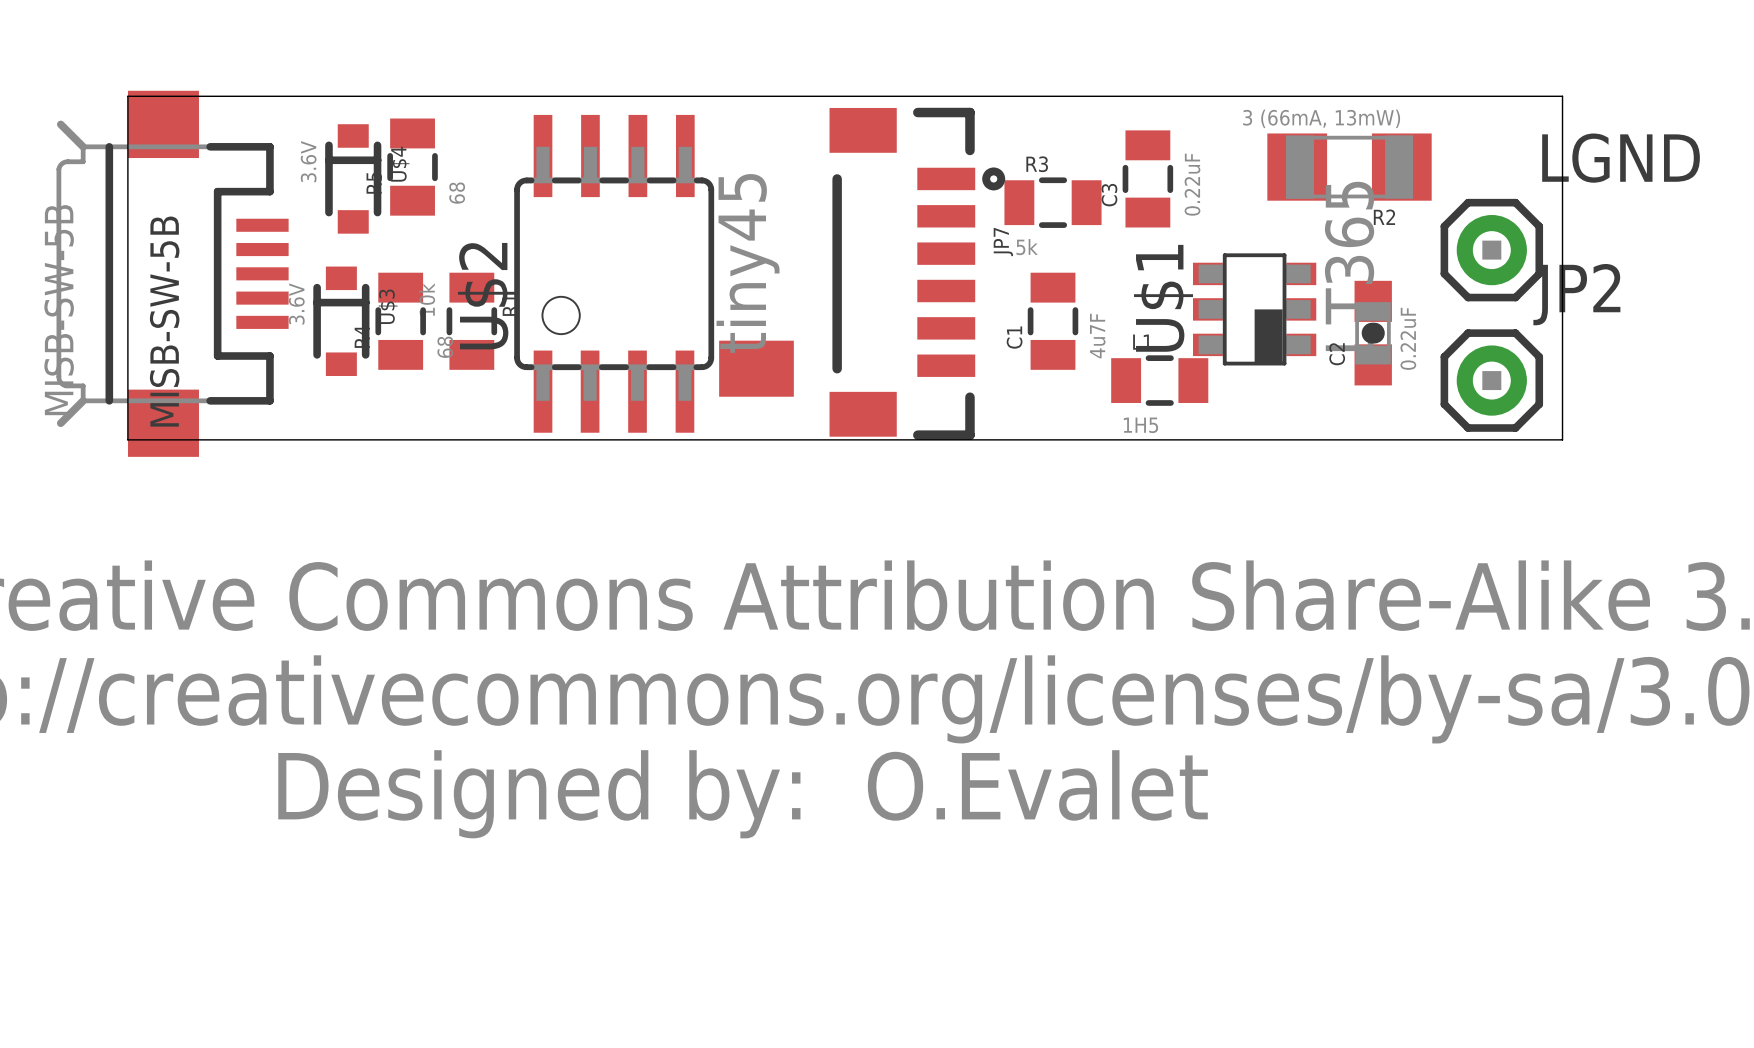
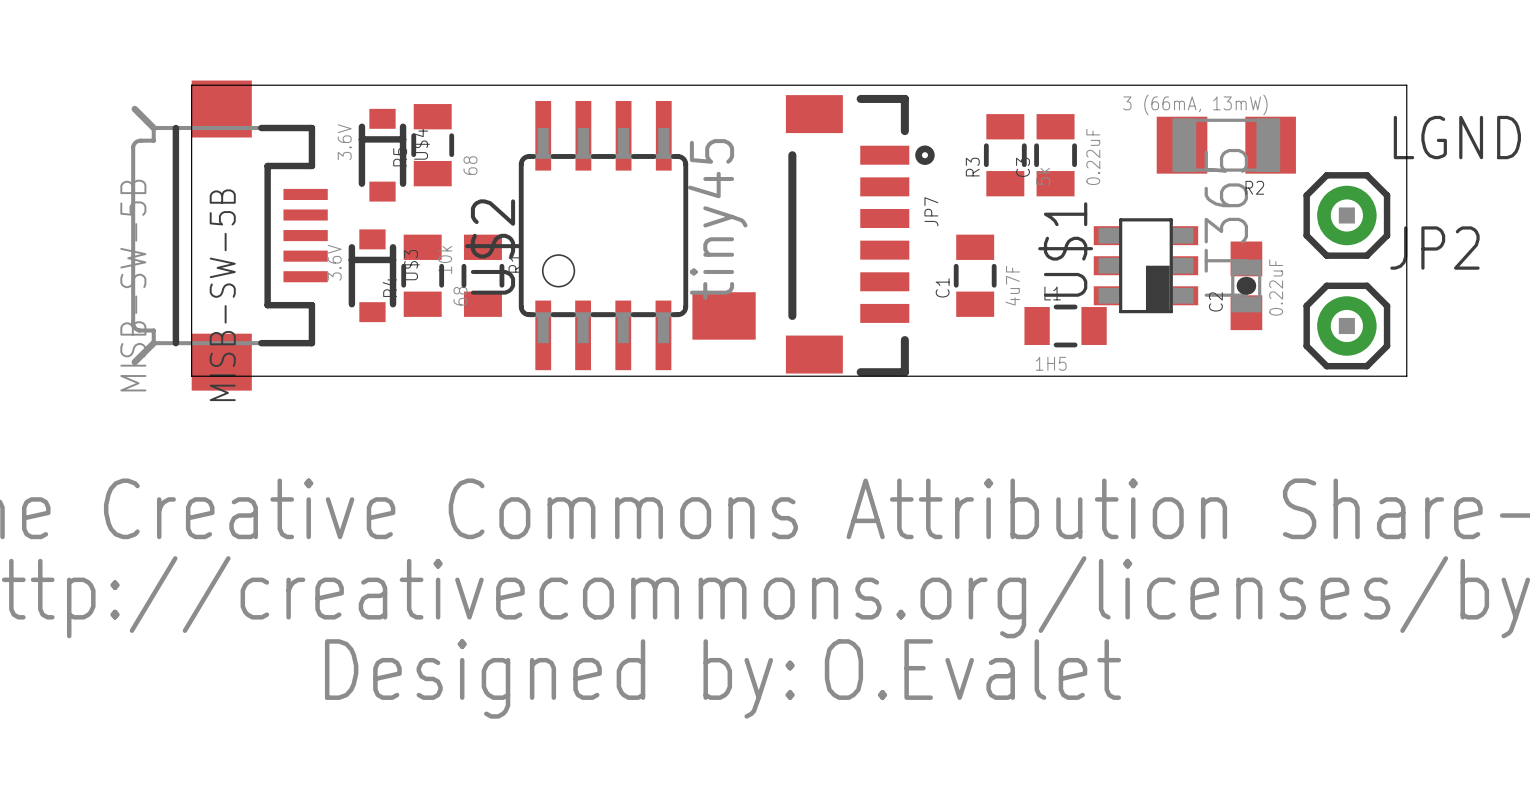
R3 rotation: 0° (1053, 202) -> 90° clockwise (1005, 155)

